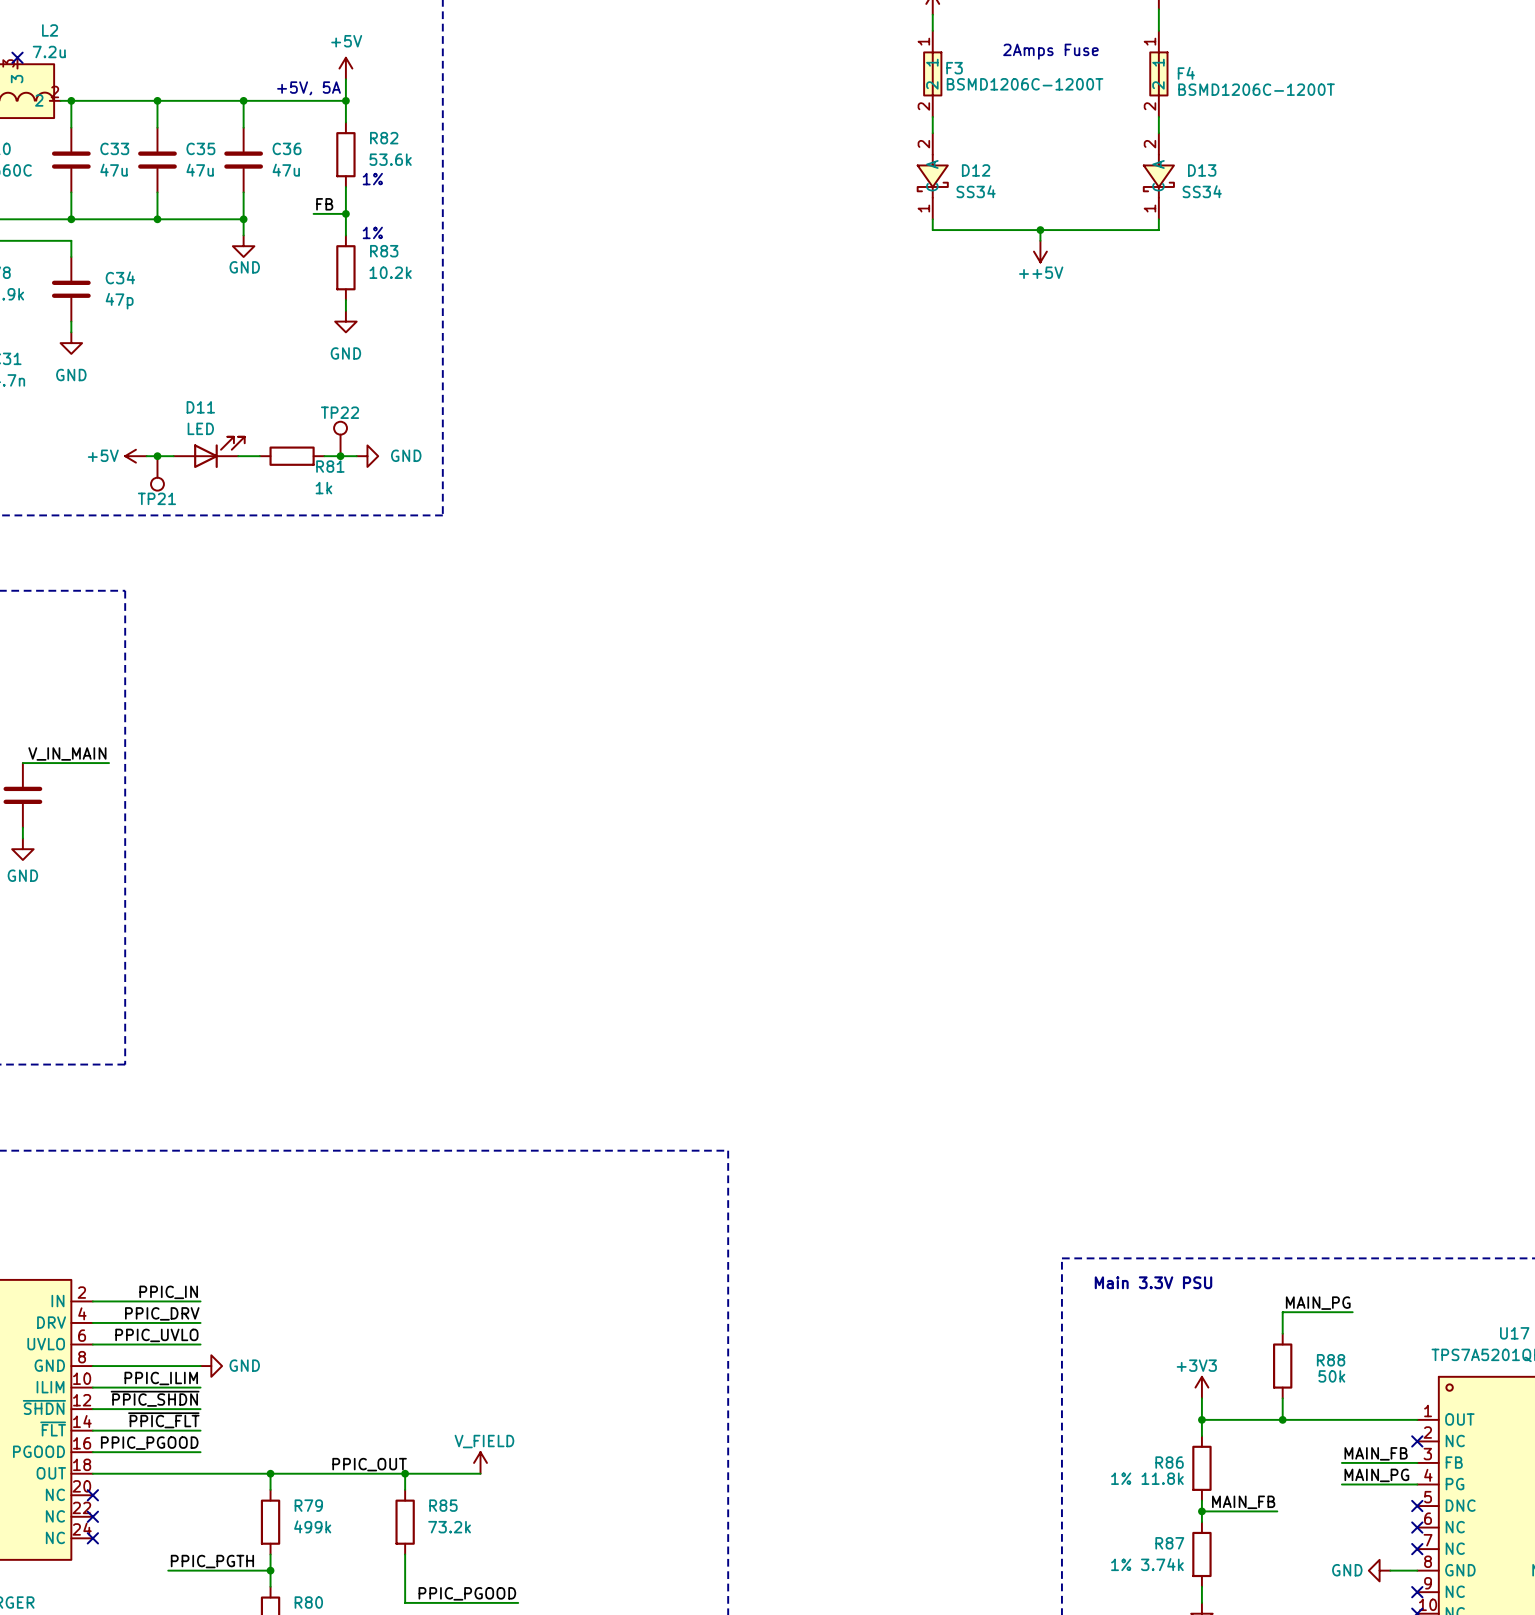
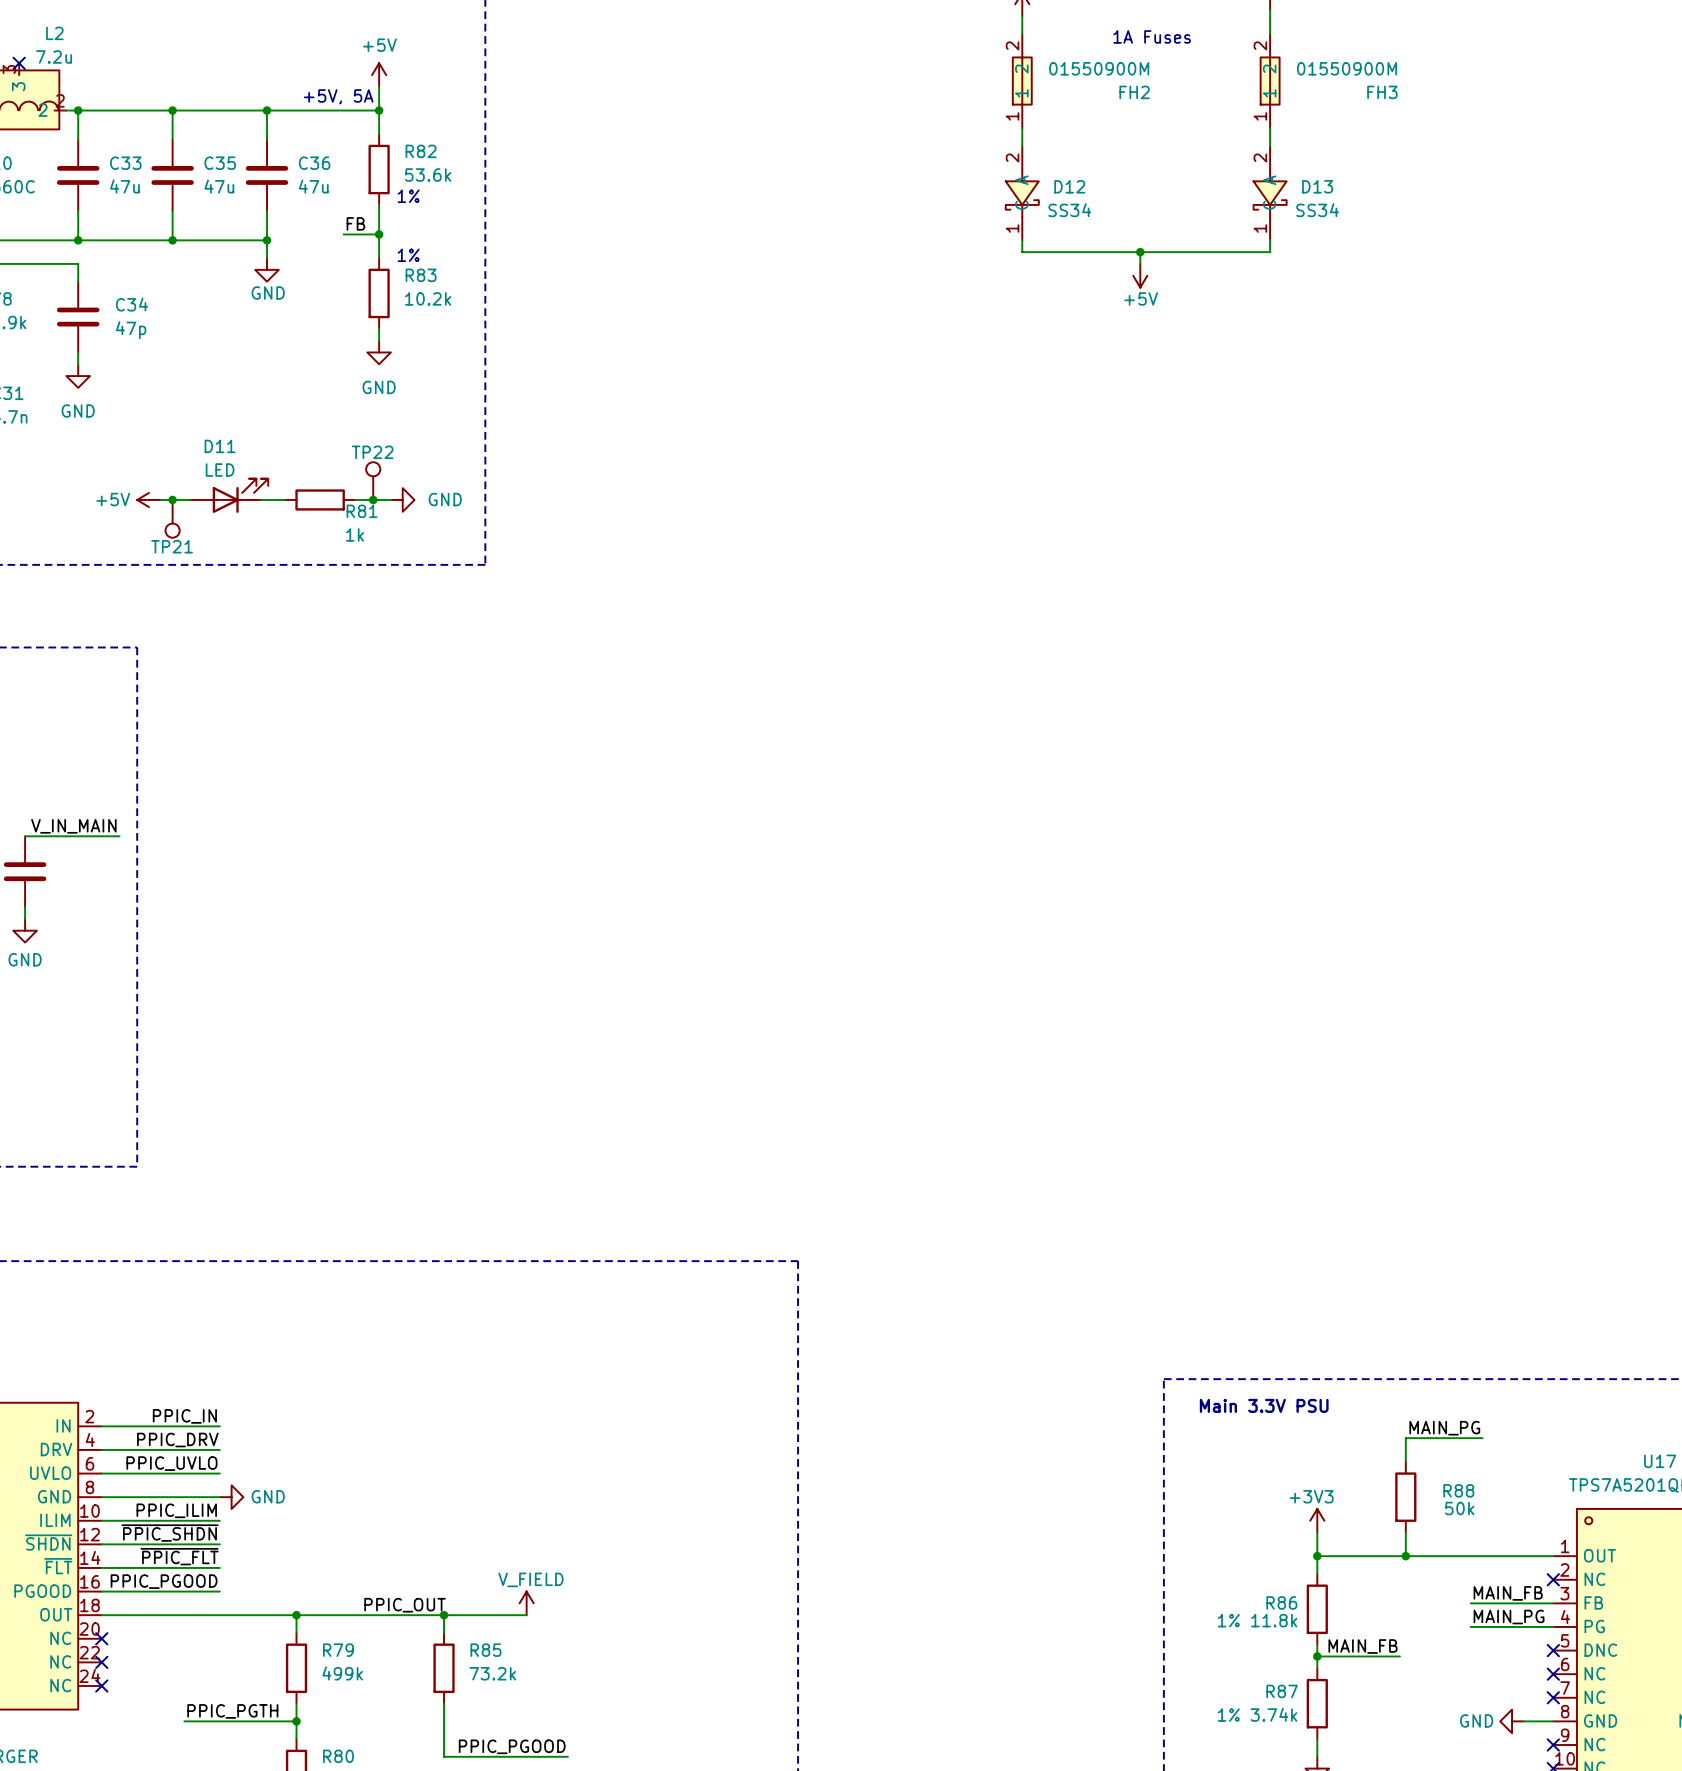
text: 2Amps Fuse (1050, 51) -> 1A Fuses (1152, 36)
F3 name: F3 (954, 68) -> FH2 (1134, 92)
F3 rotation: 0° (932, 73) -> 180° (1022, 81)
F4 rotation: 0° (1158, 73) -> 180° (1270, 81)
F4 name: F4 (1186, 73) -> FH3 (1382, 92)
F3 value: BSMD1206C-1200T (1025, 84) -> 01550900M (1099, 68)
F4 value: BSMD1206C-1200T (1256, 89) -> 01550900M (1347, 68)
power symbol: ++5V (1040, 251) -> +5V (1140, 275)

